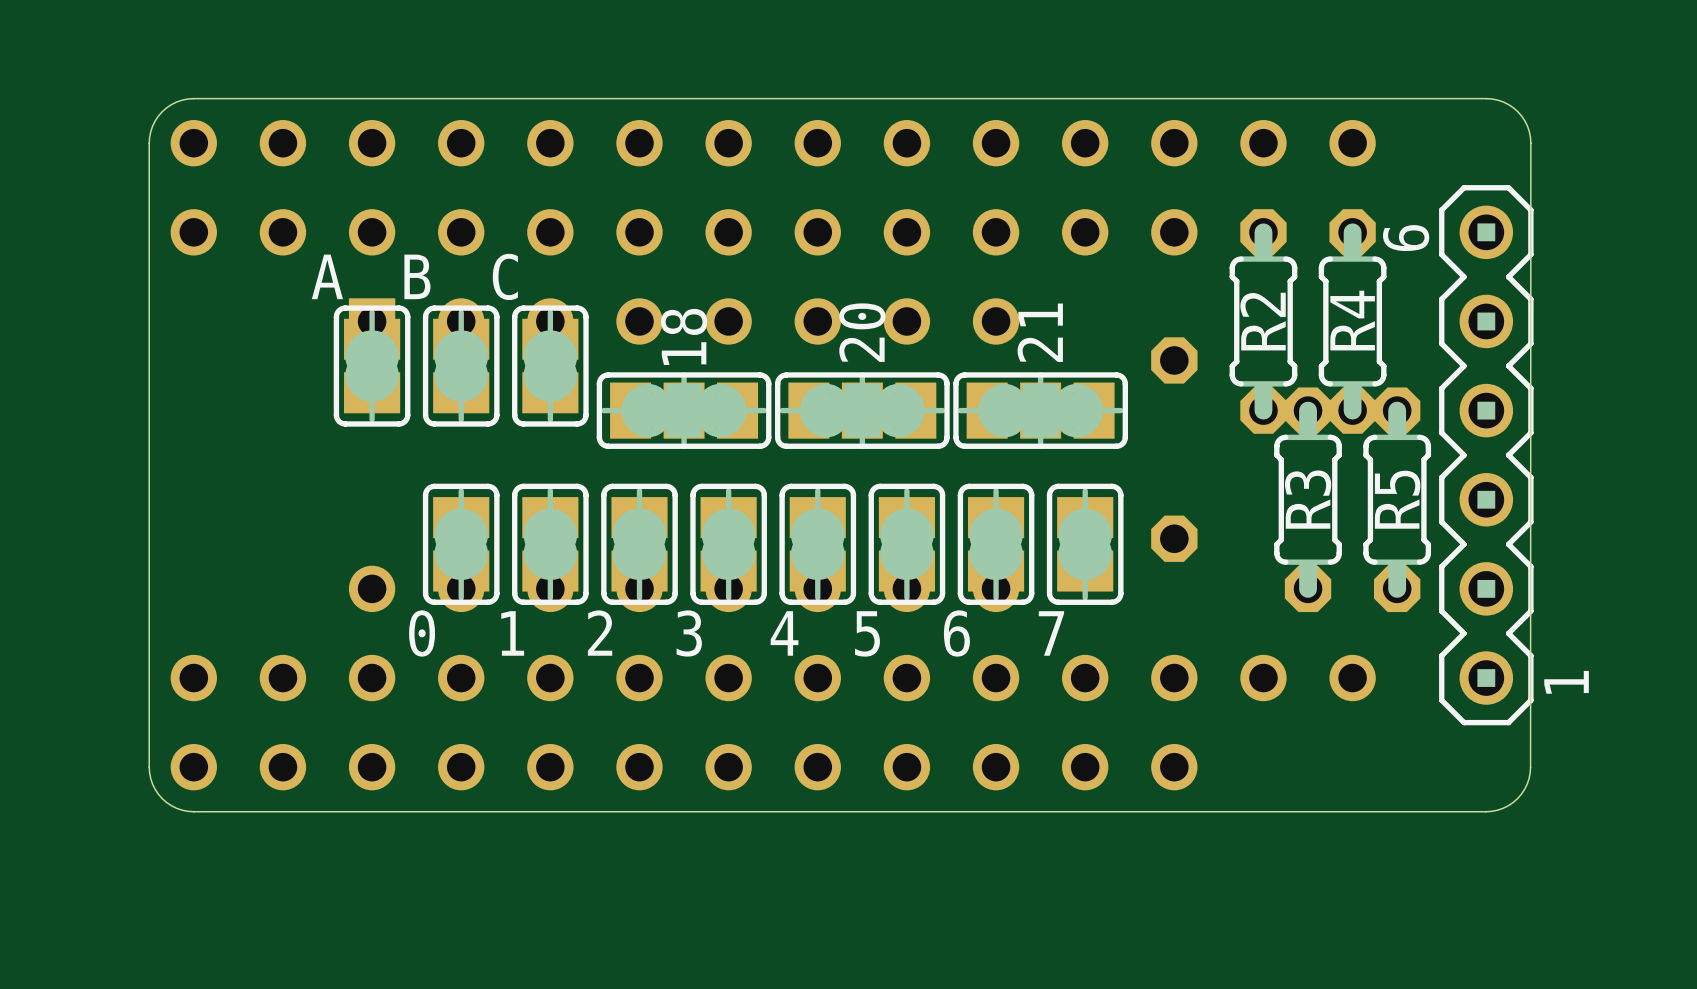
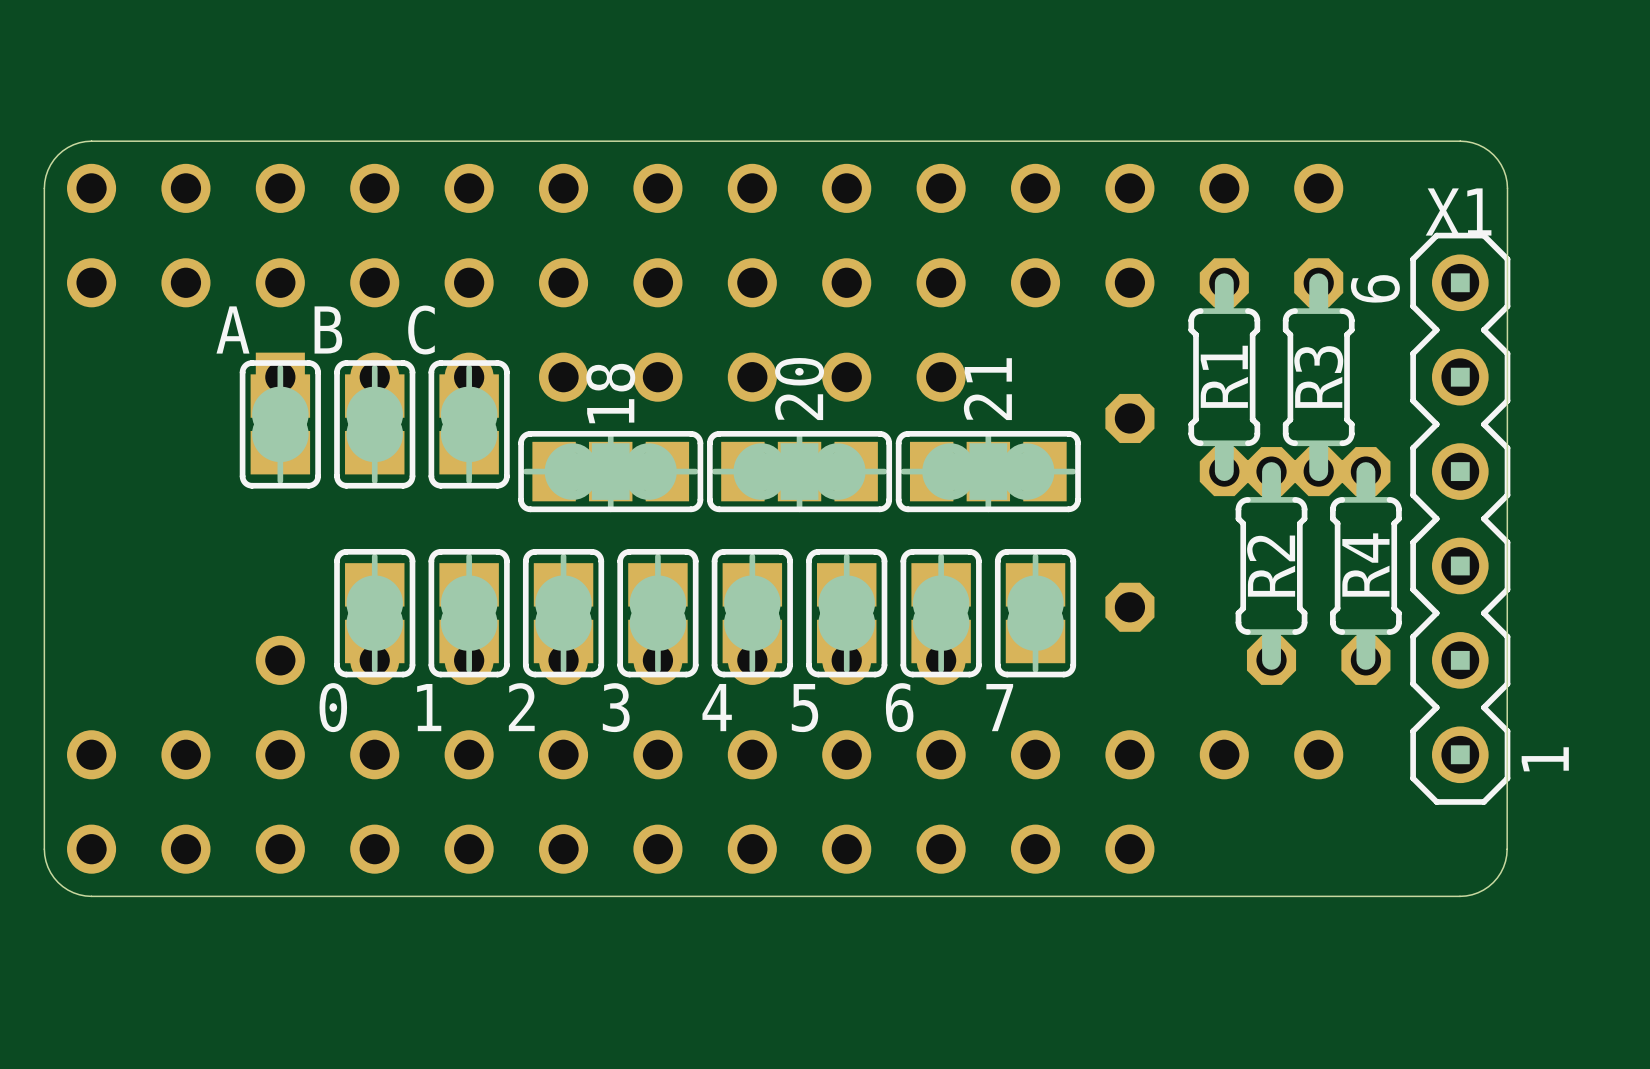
X1 name: none -> X1 (1458, 211)
R4 name: R4 (1352, 320) -> R3 (1318, 377)
R2 name: R2 (1263, 321) -> R1 (1224, 376)
R3 name: R3 (1308, 499) -> R2 (1271, 566)
R5 name: R5 (1397, 499) -> R4 (1365, 565)

